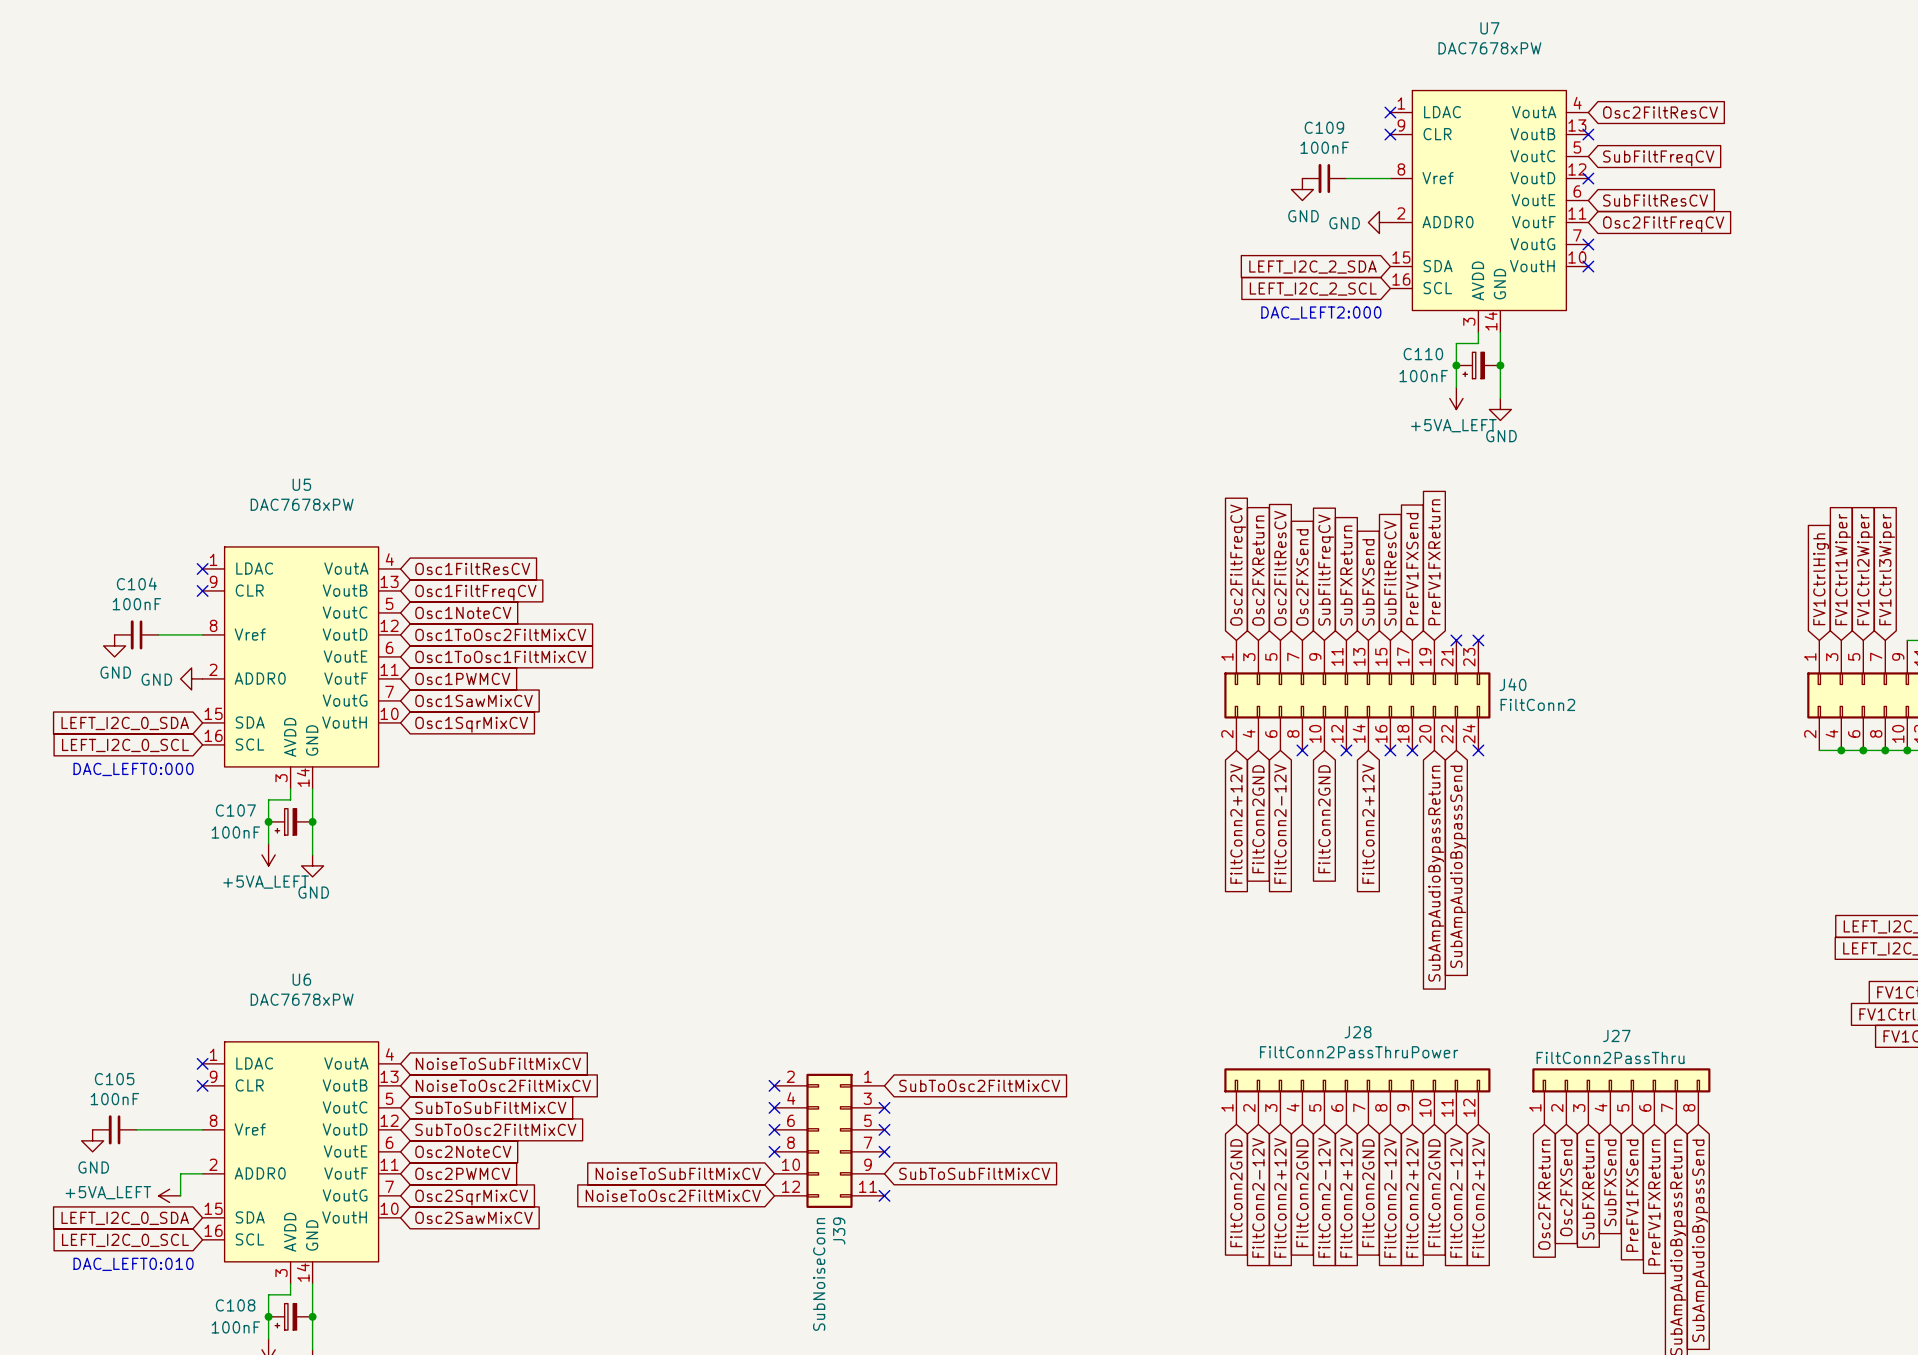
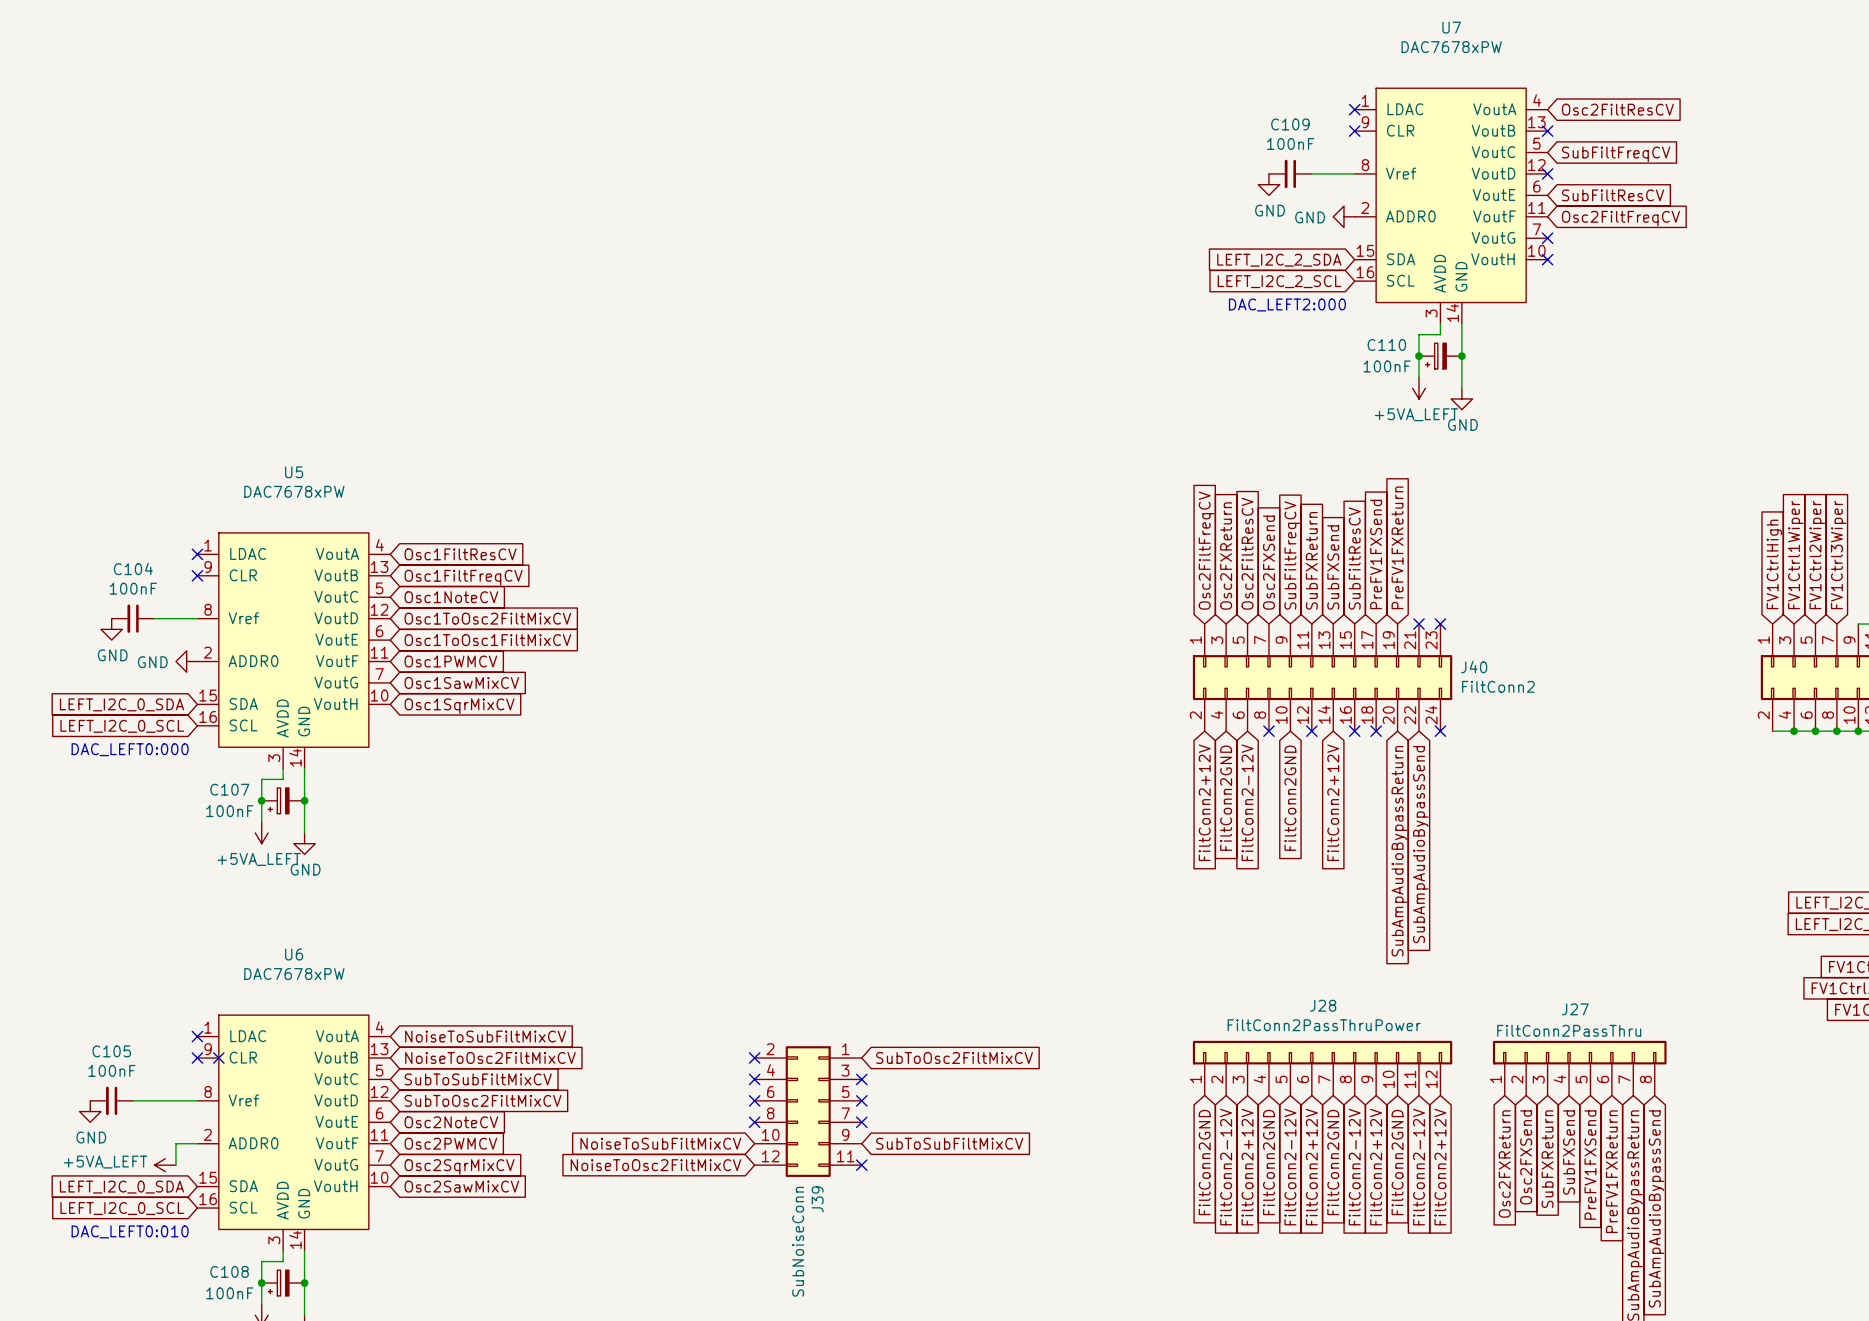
no-connect mark: none -> (218, 1058)

